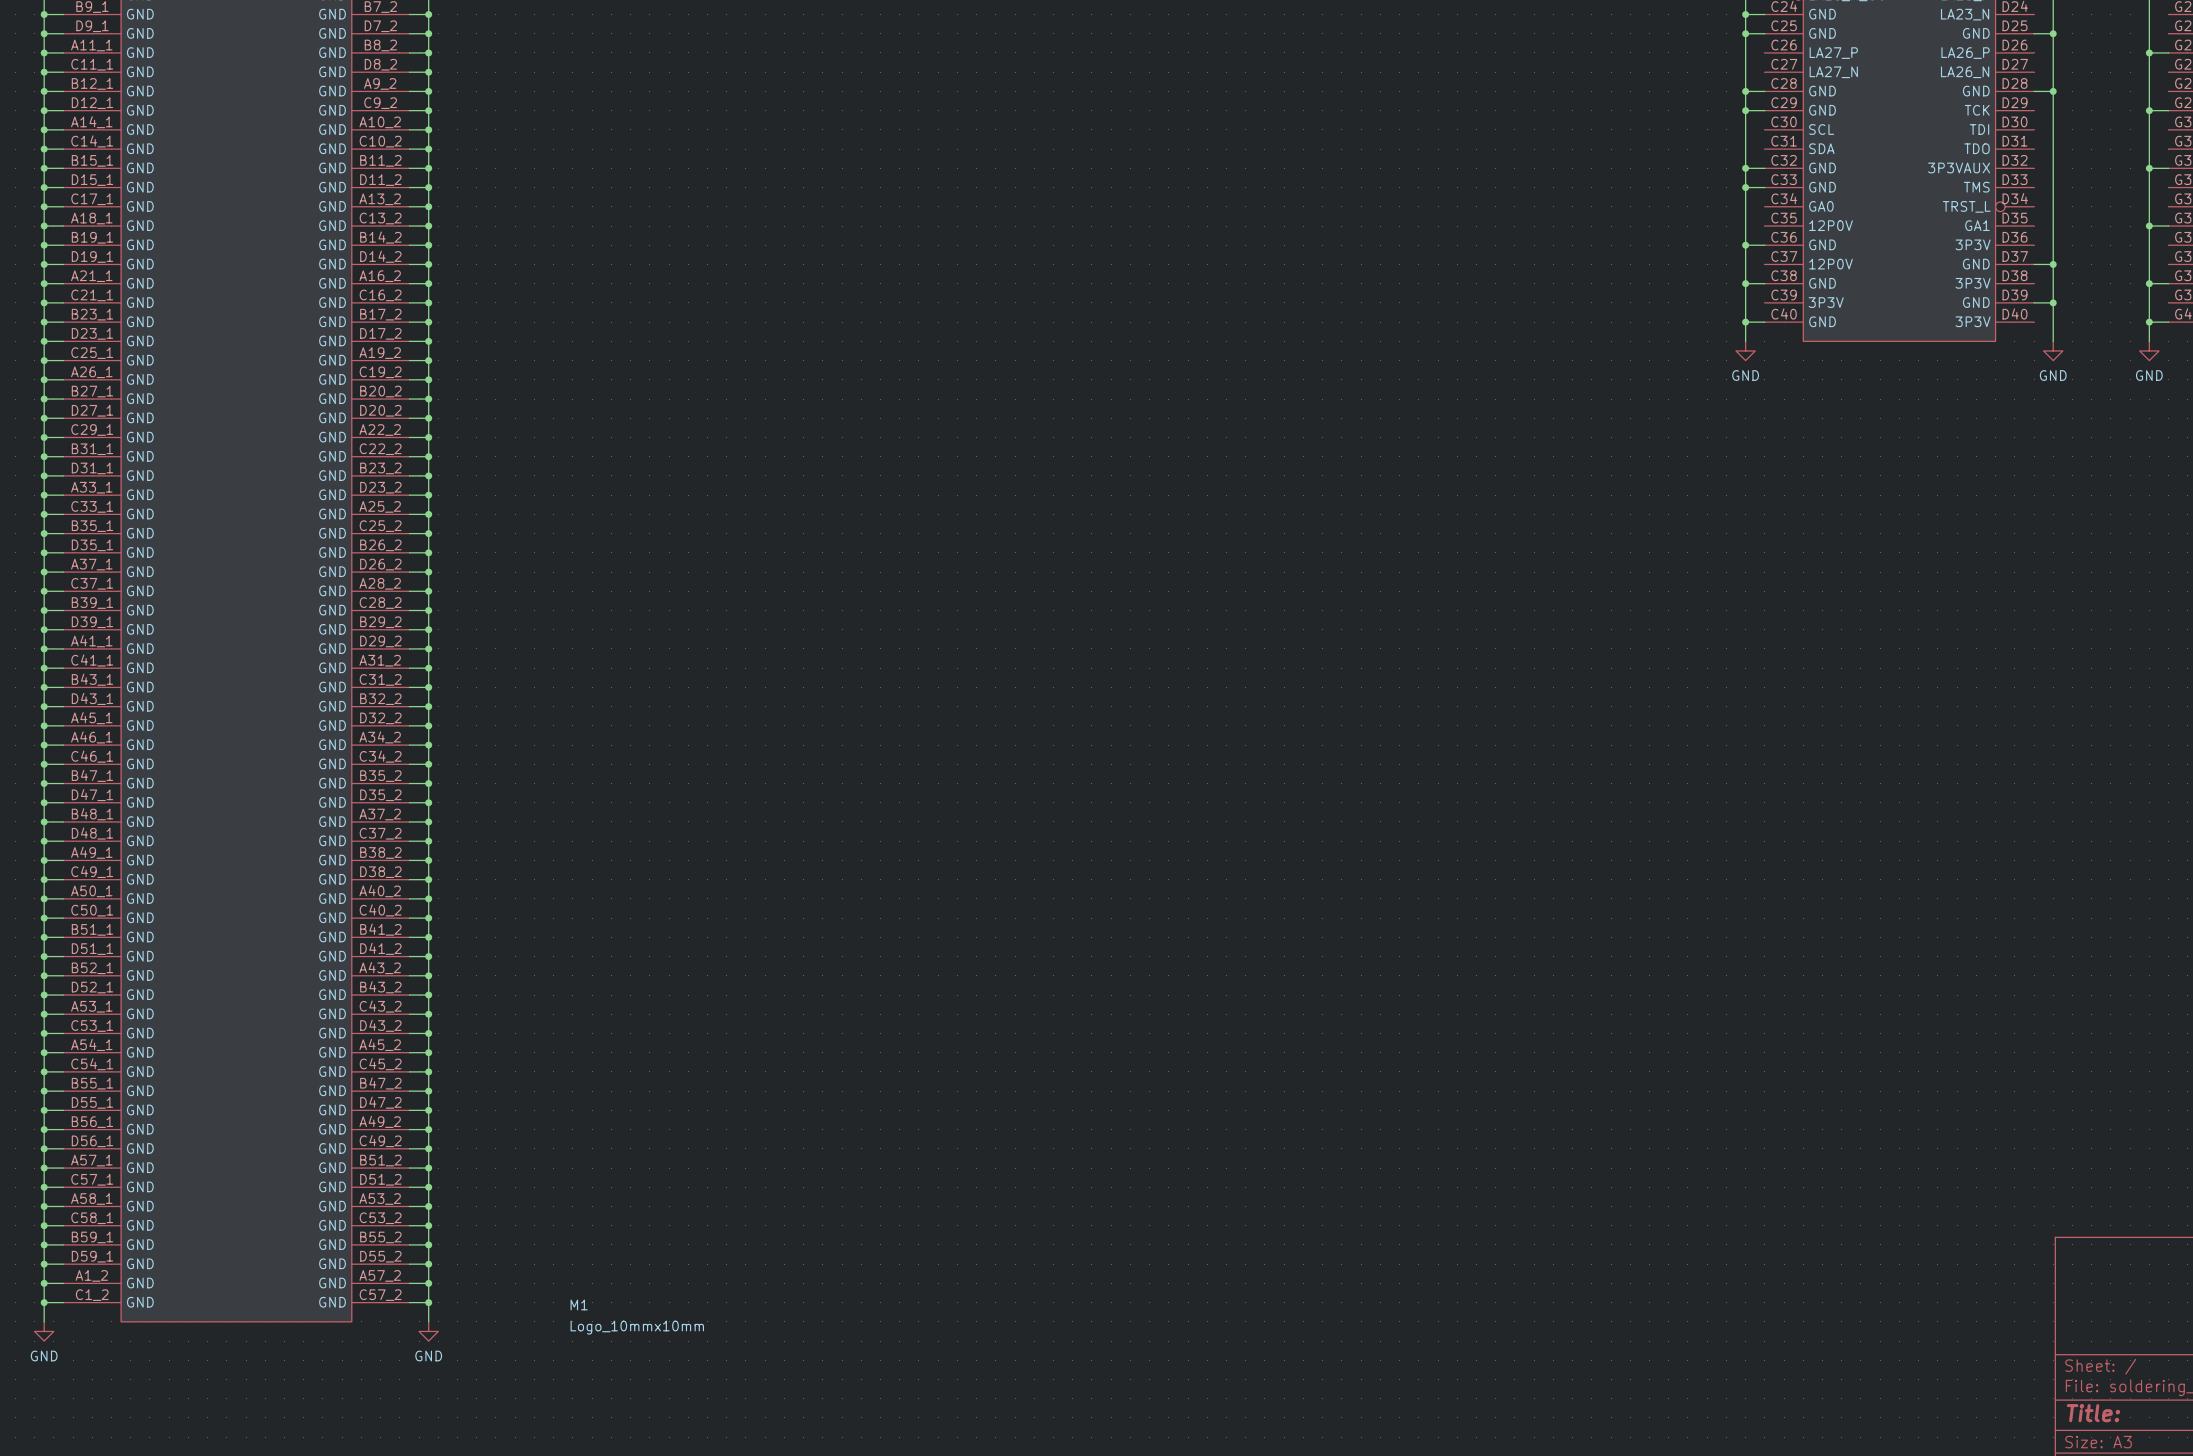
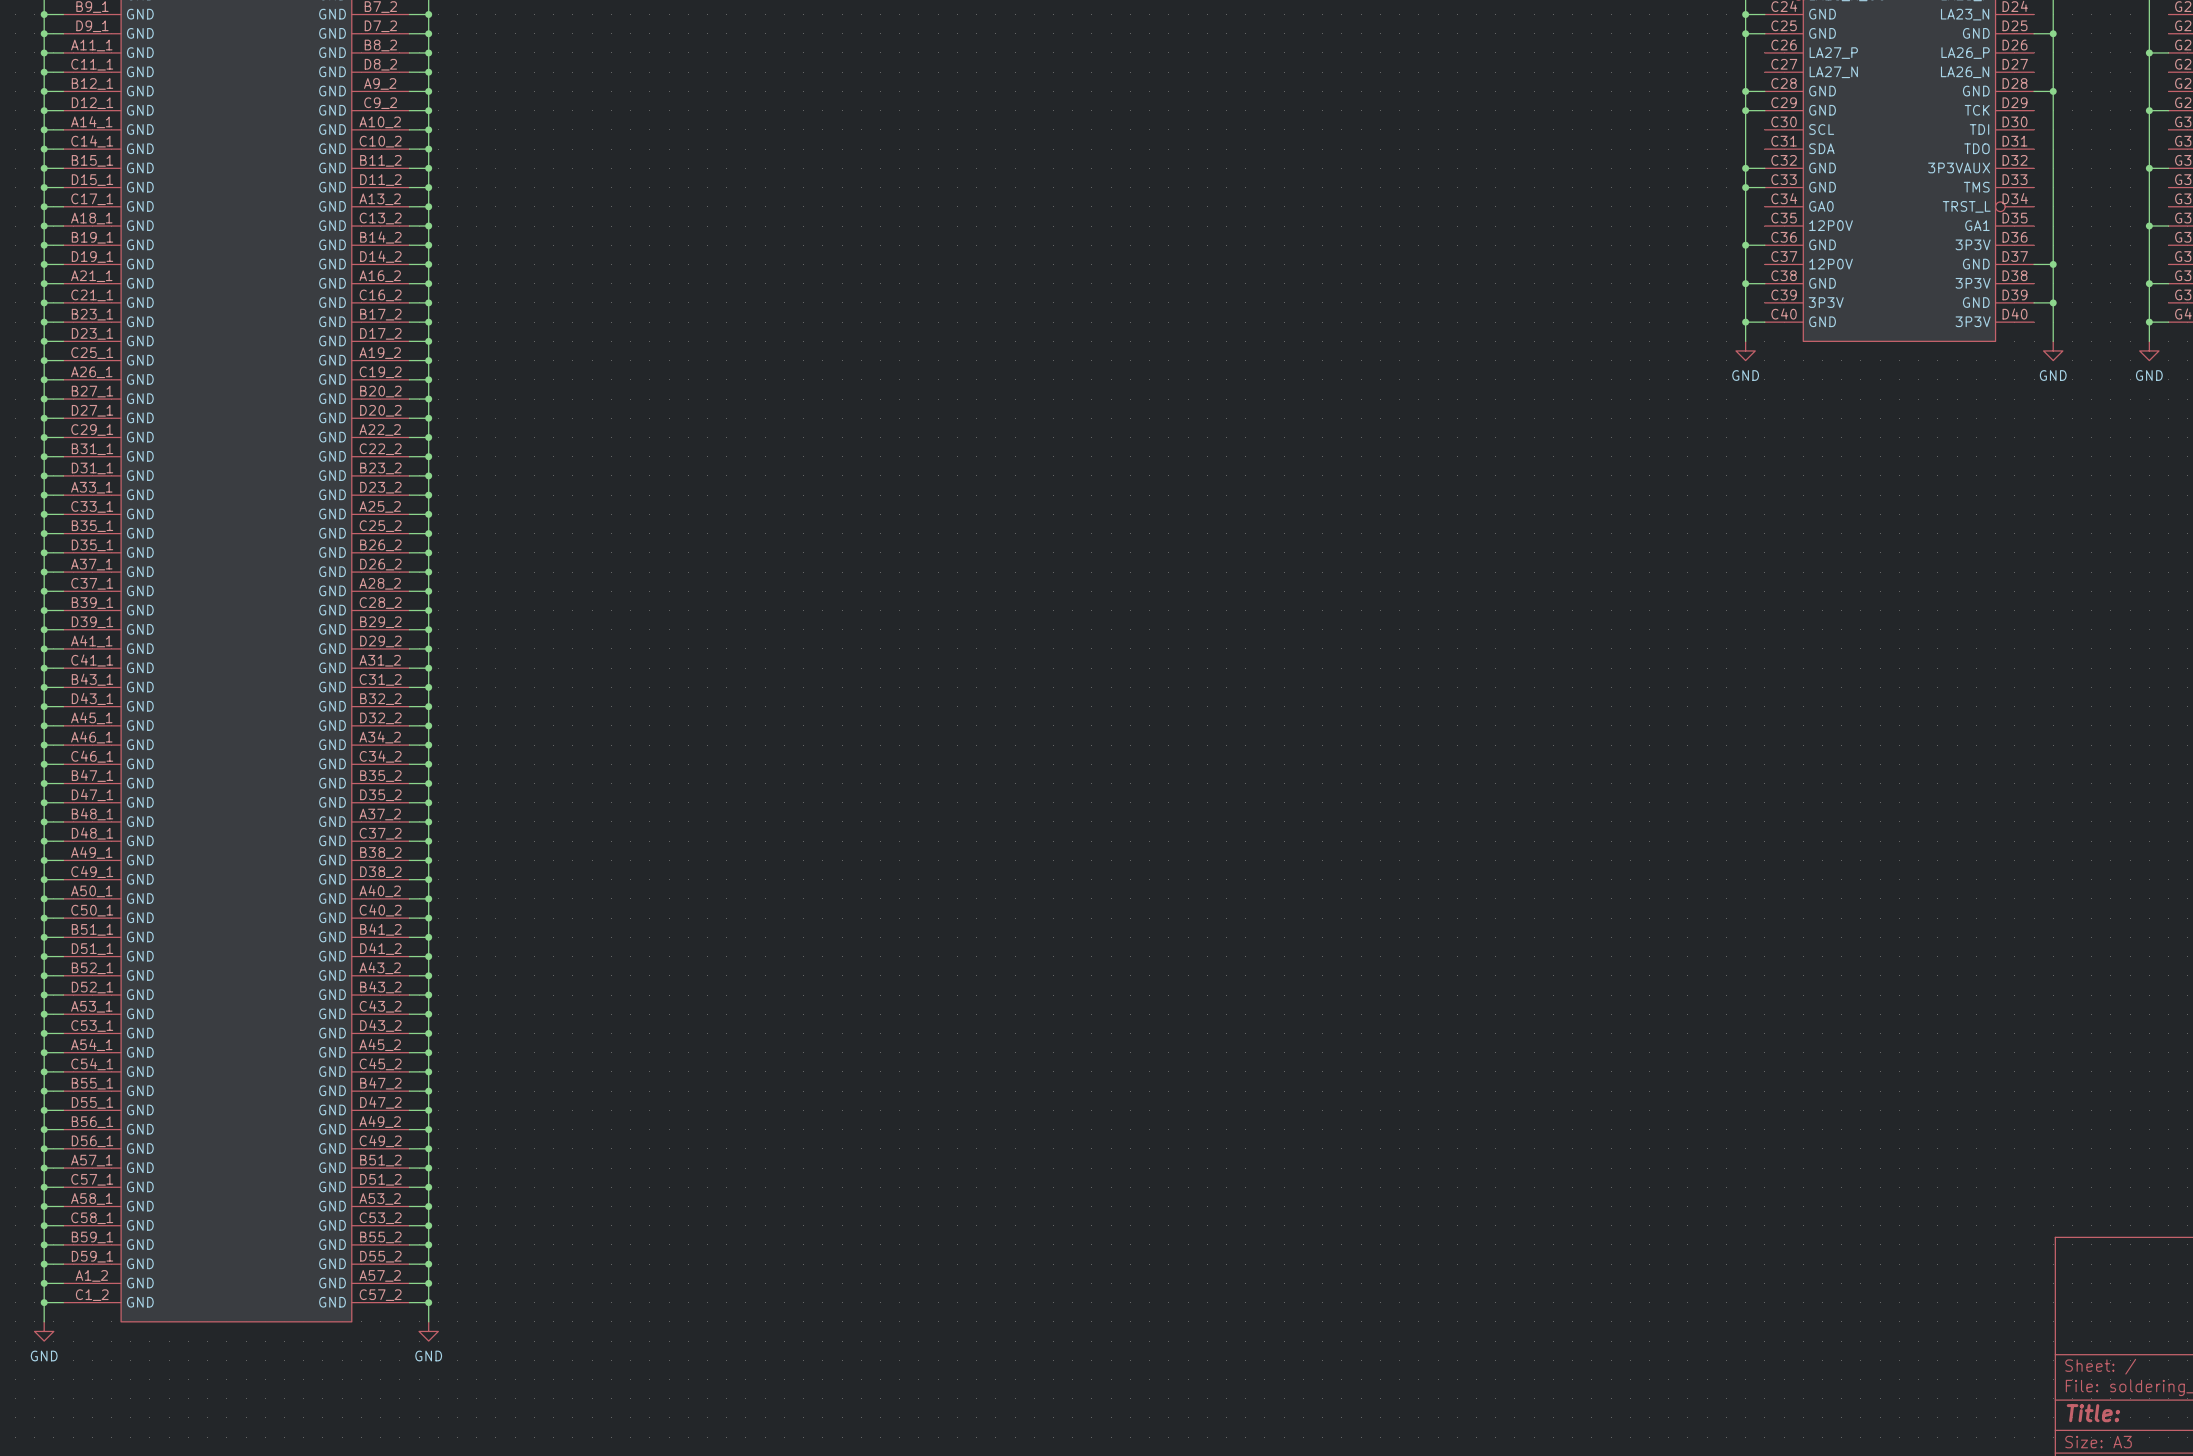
M1: Logo_10mmx10mm (637, 1317) -> none

